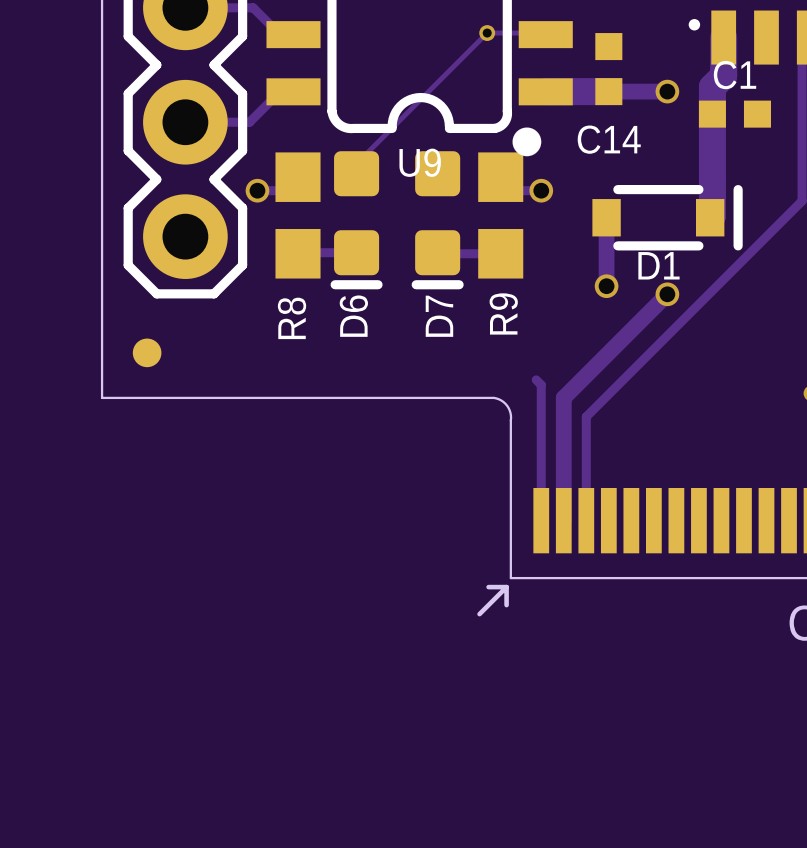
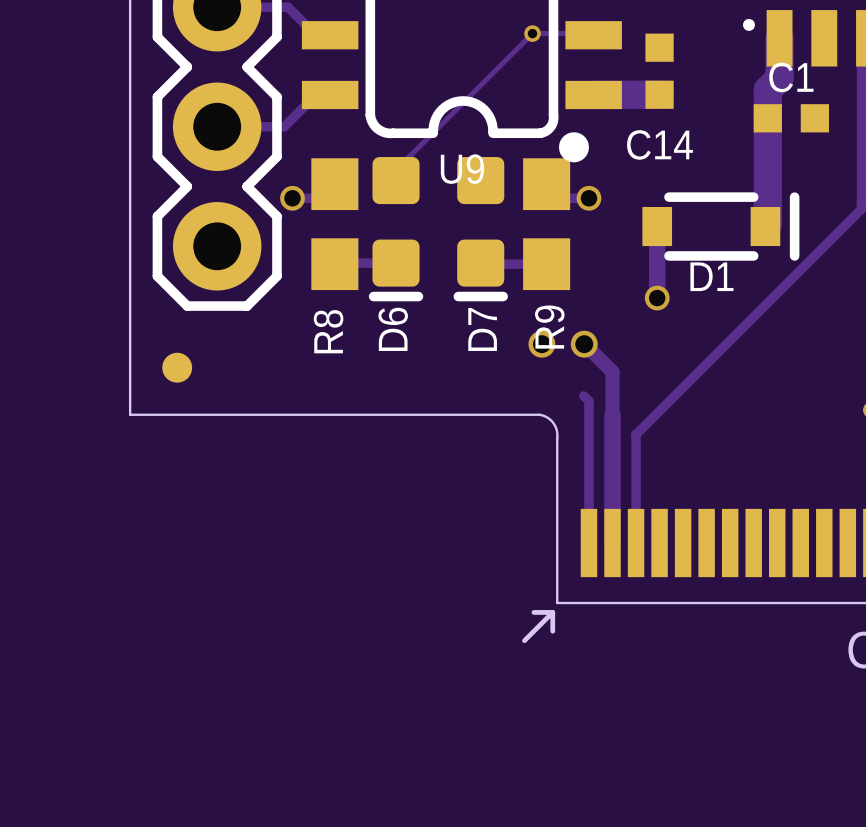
track: (608, 91) (667, 91) -> none
via: (667, 91) -> none
track: (667, 294) (563, 397) -> (586, 346) (612, 371) (612, 414)
via: (667, 294) -> none
via: none -> (541, 344)
via: none -> (584, 344)

